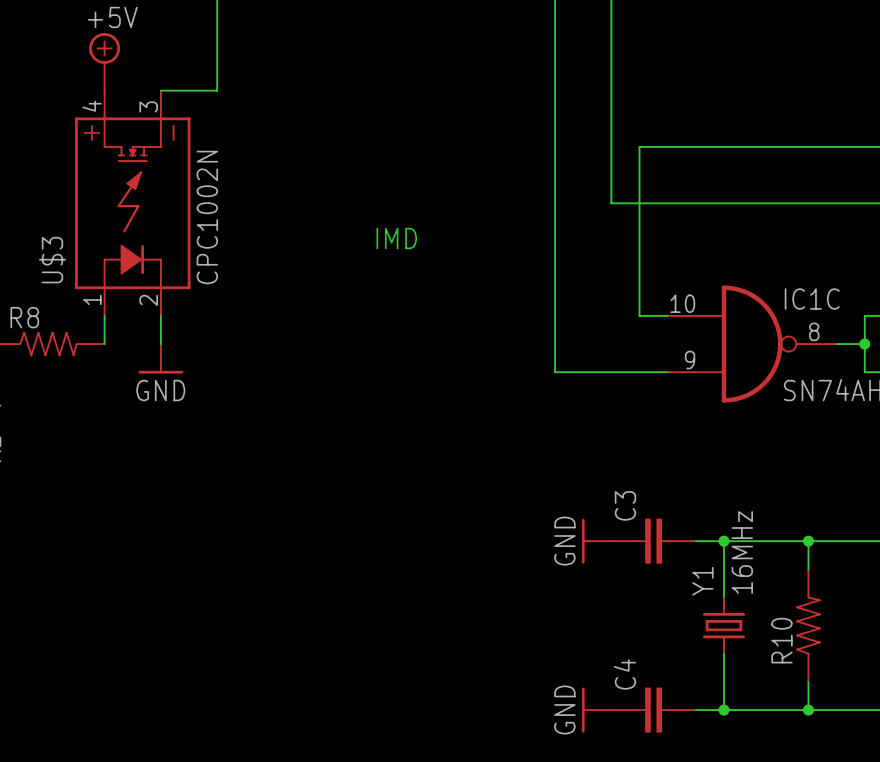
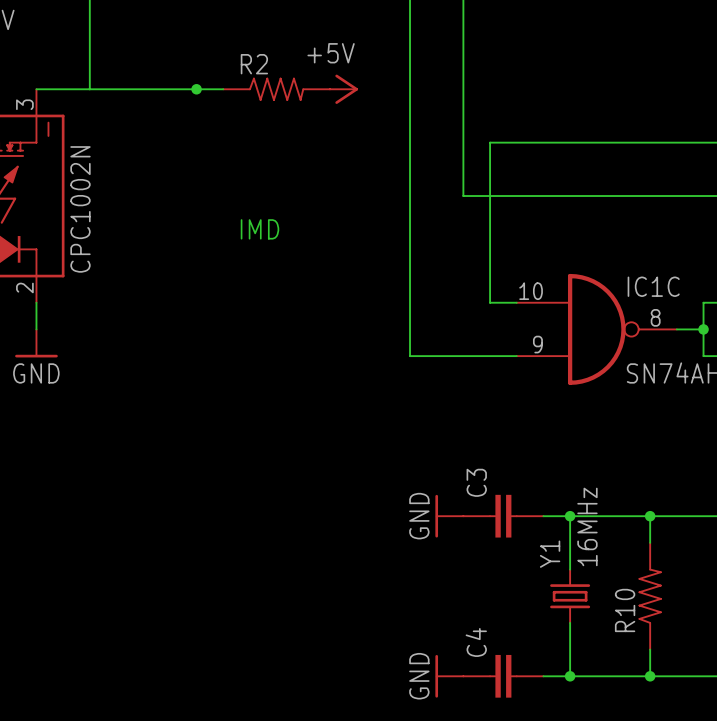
wire: none -> (89, 89) (223, 89)
junction: none -> (196, 89)
R2: none -> (276, 89)
power symbol: none -> +5V (343, 89)

